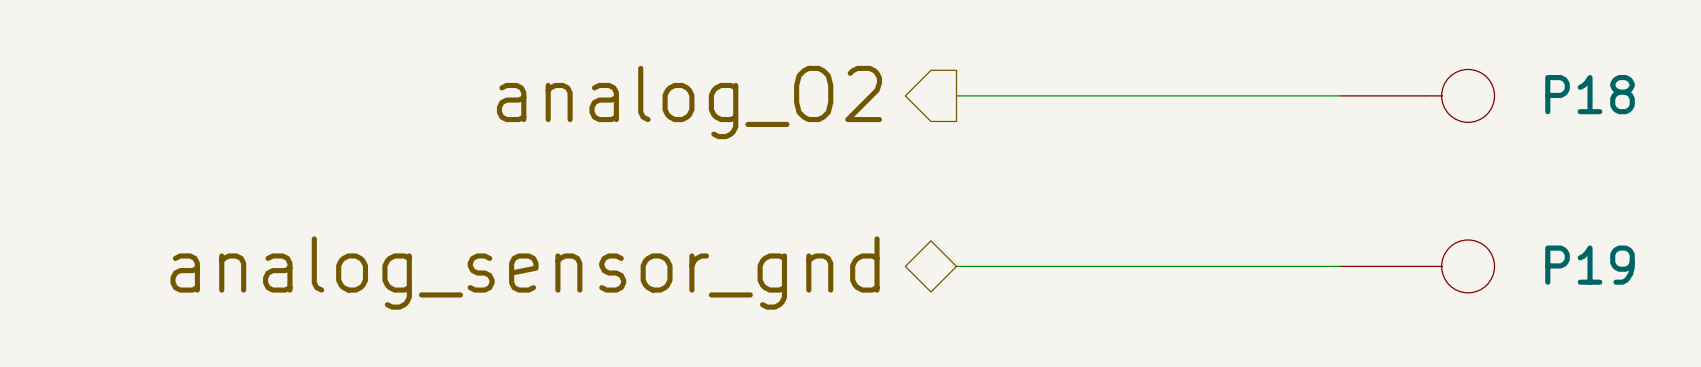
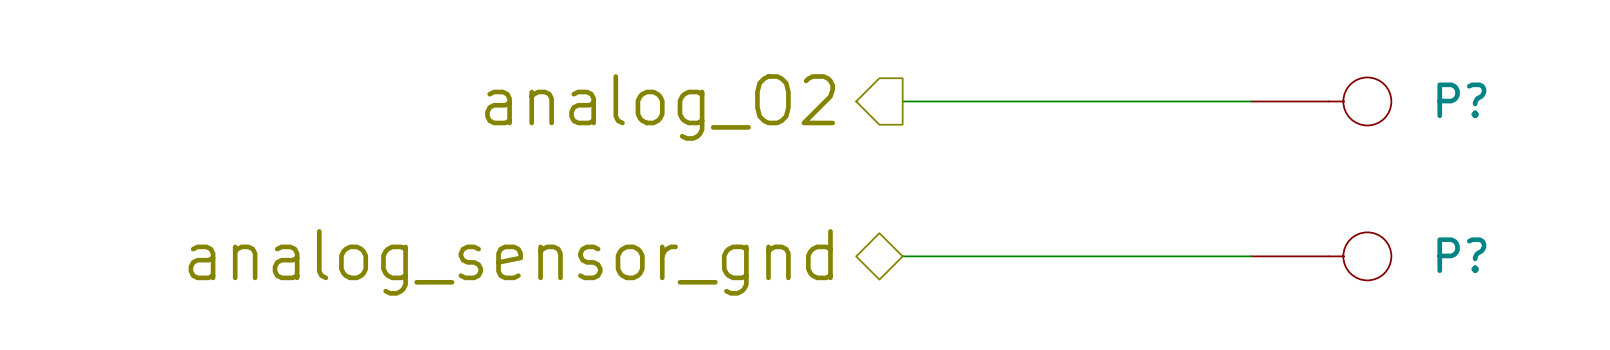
P18 name: P18 (1590, 94) -> P? (1461, 100)
P19 name: P19 (1590, 265) -> P? (1461, 255)

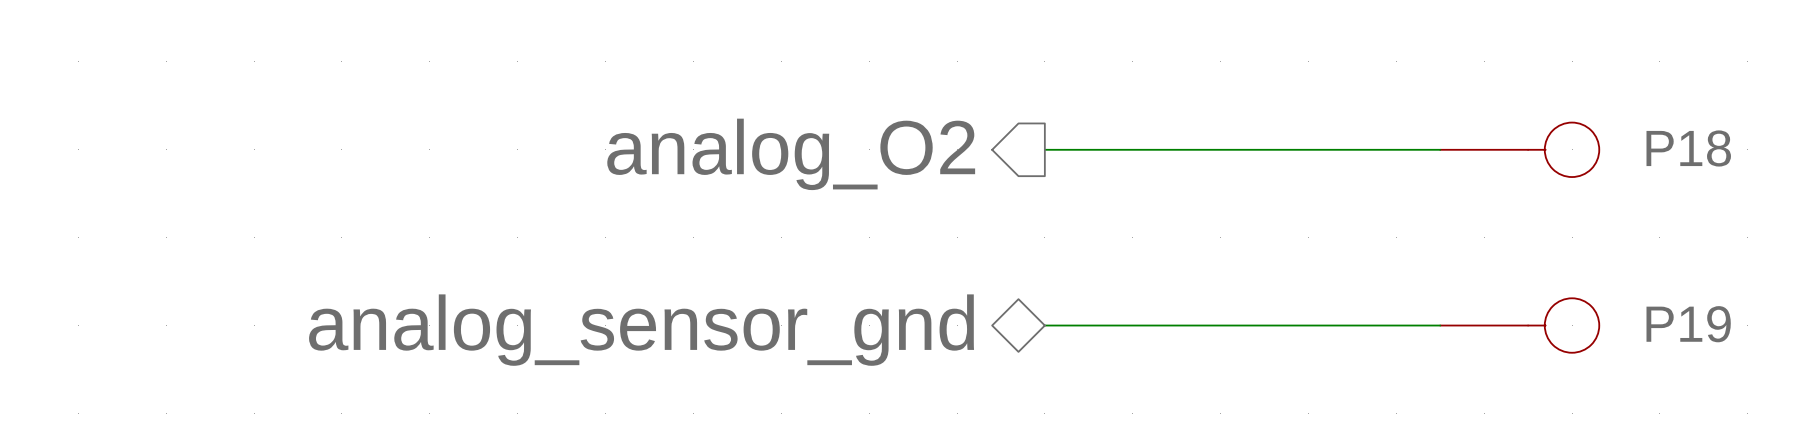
P? name: P? (1461, 100) -> P18 (1688, 148)
P? name: P? (1461, 255) -> P19 (1688, 324)

